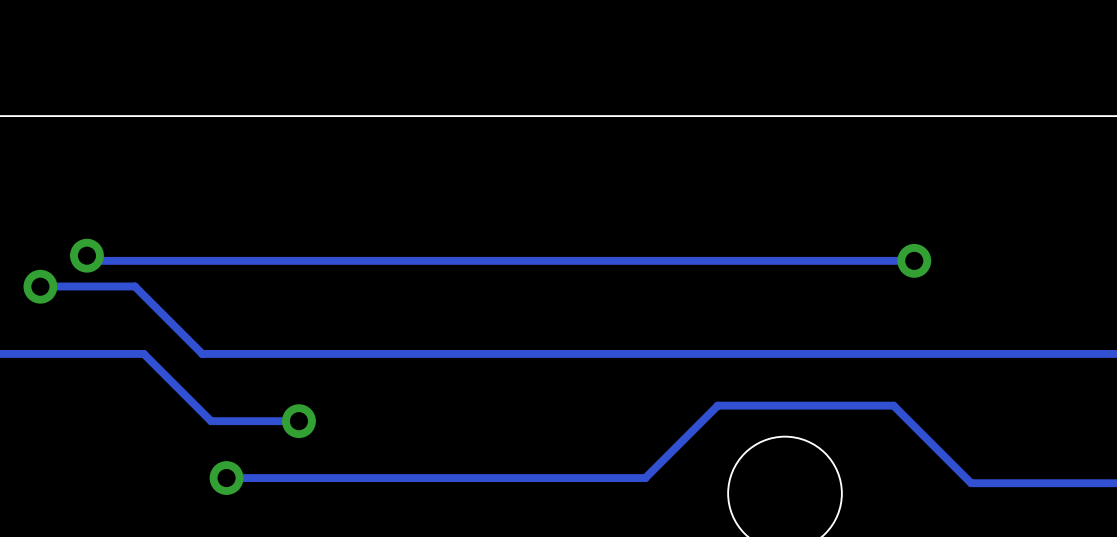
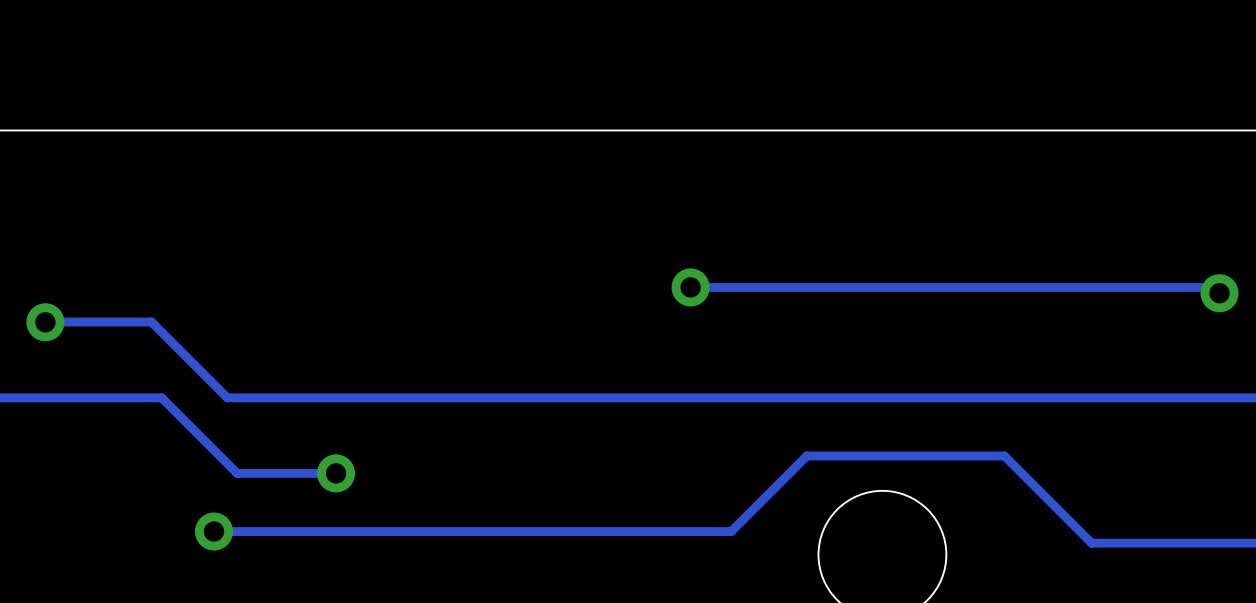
track: (86, 255) (92, 260) (914, 260) -> none
via: (86, 255) -> none
track: none -> (690, 287) (1213, 287) (1219, 293)
via: none -> (690, 287)
via: (914, 260) -> none
via: none -> (1219, 293)
track: (650, 472) (645, 478) (226, 478) -> (731, 531) (213, 531)
via position: (226, 478) -> (213, 531)

